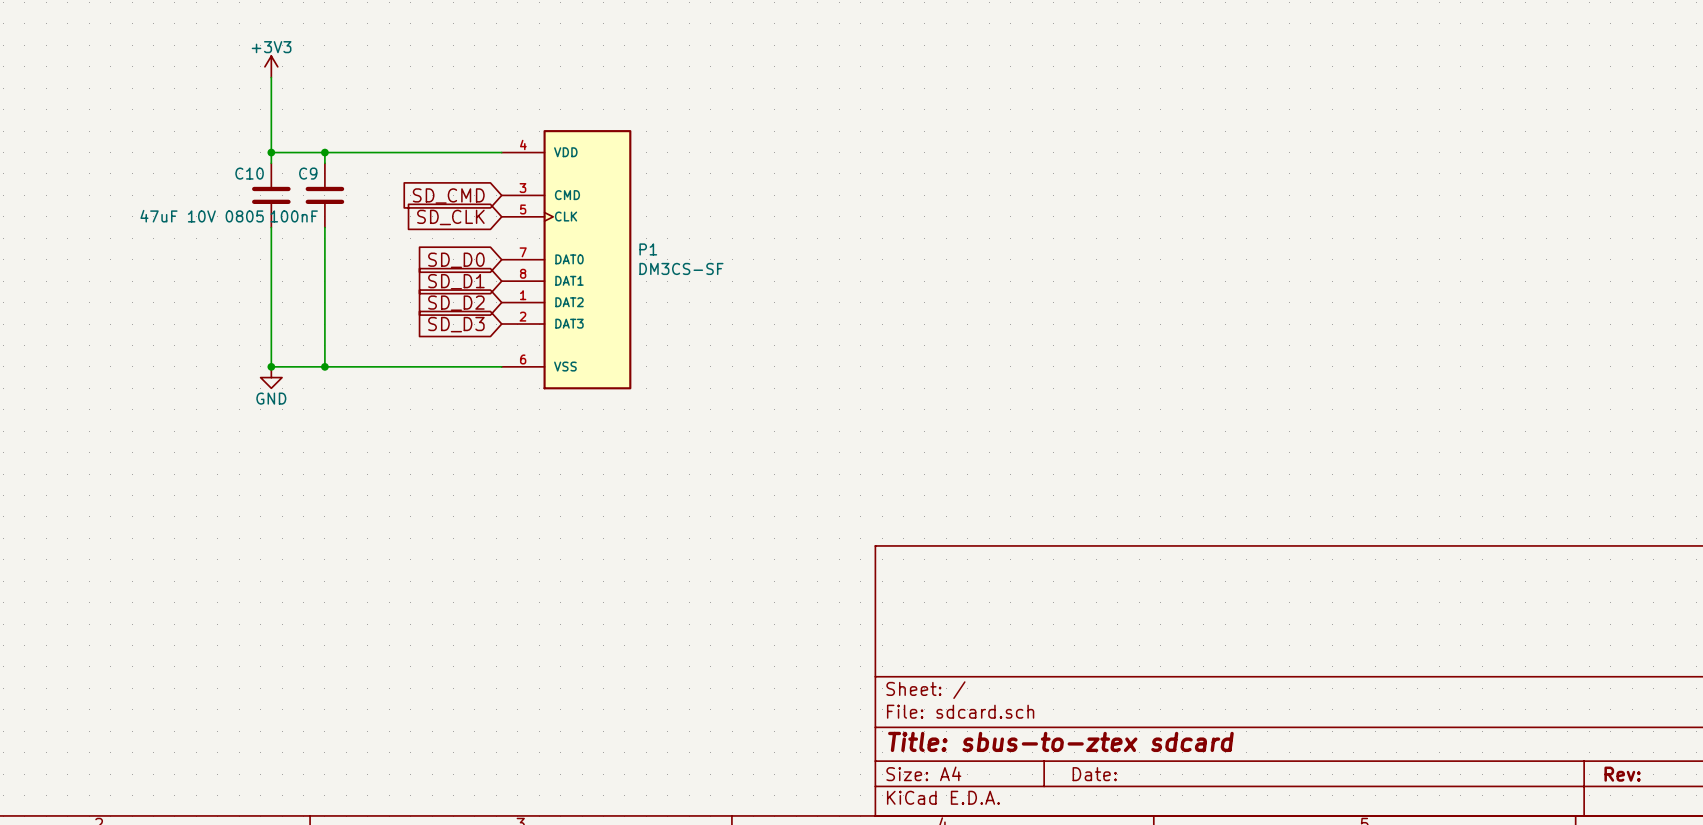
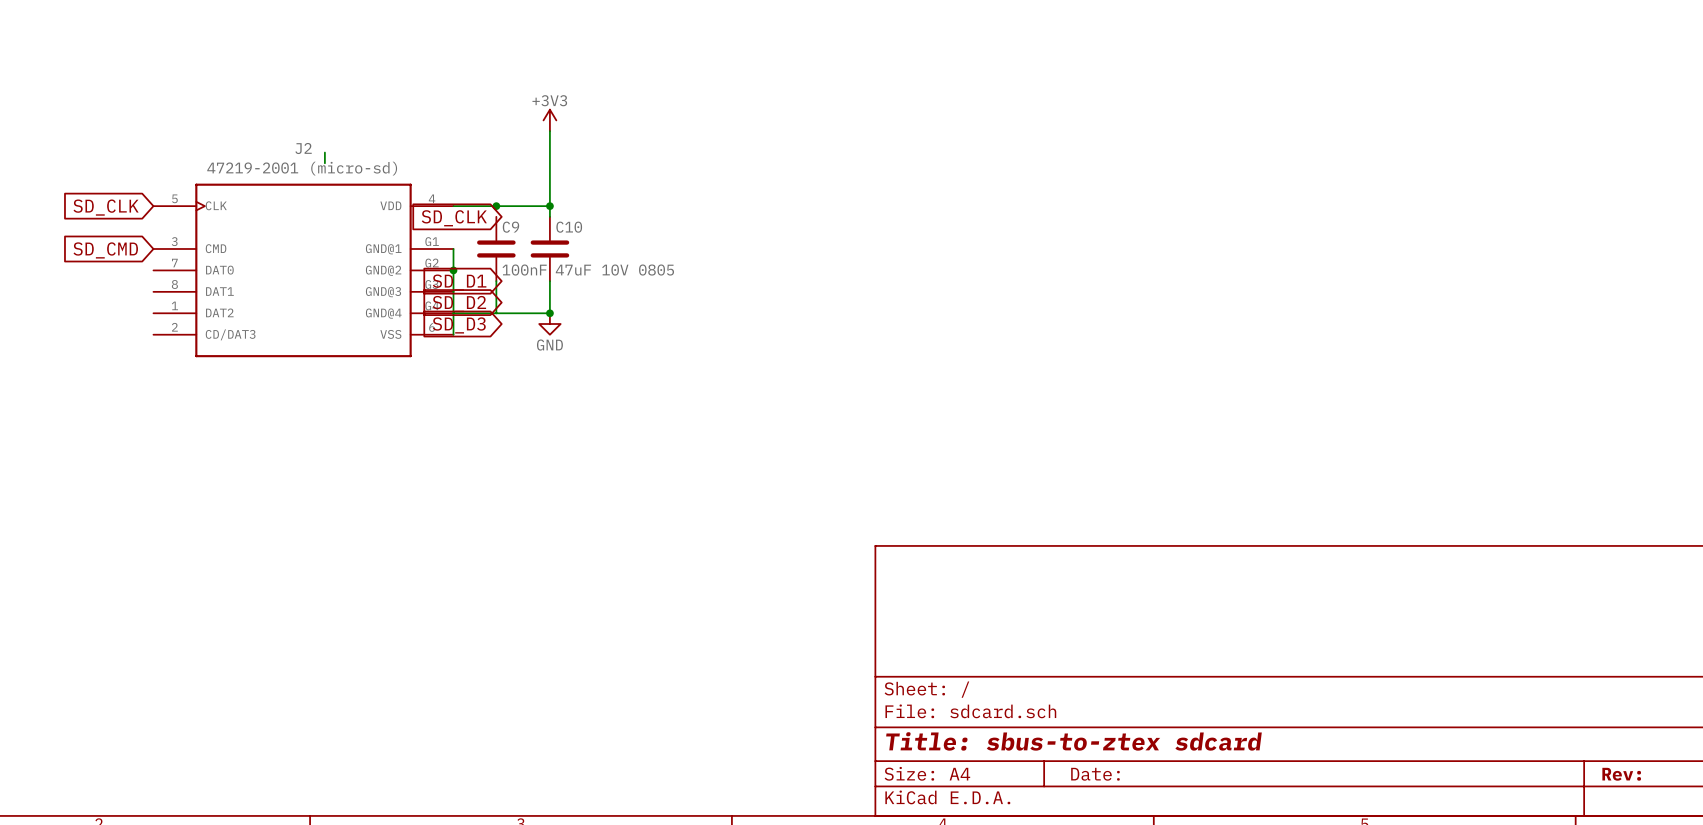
power symbol: +3V3 (271, 66) -> none
wire: (271, 77) (271, 163) -> none
power symbol: none -> +3V3 (549, 120)
wire: (271, 152) (501, 152) -> none
junction: (271, 152) -> none
junction: (324, 152) -> none
C10 name position: C10 (249, 173) -> C10 (569, 227)
C9 name position: C9 (308, 173) -> C9 (510, 227)
C10 position: (271, 195) -> (549, 248)
C9 position: (324, 195) -> (496, 248)
global label: SD_CMD (448, 196) -> none
global label: none -> SD_CLK (106, 207)
wire: none -> (453, 206) (549, 206)
junction: none -> (496, 206)
junction: none -> (549, 206)
C10 value position: 47uF 10V 0805 (202, 216) -> 47uF 10V 0805 (614, 270)
C9 value position: 100nF (294, 216) -> 100nF (524, 270)
wire: (271, 227) (271, 366) (501, 366) -> none
wire: (324, 227) (324, 366) -> none
wire: none -> (453, 248) (453, 334)
global label: none -> SD_CMD (105, 250)
P1: DM3CS-SF (566, 259) -> none
global label: SD_D0 (456, 260) -> none
J2: none -> 47219-2001 (micro-sd) (303, 270)
junction: none -> (453, 270)
wire: none -> (496, 281) (496, 313)
wire: none -> (549, 281) (549, 313) (453, 313)
junction: none -> (549, 313)
power symbol: none -> GND (549, 324)
junction: (271, 366) -> none
junction: (324, 366) -> none
power symbol: GND (271, 377) -> none

